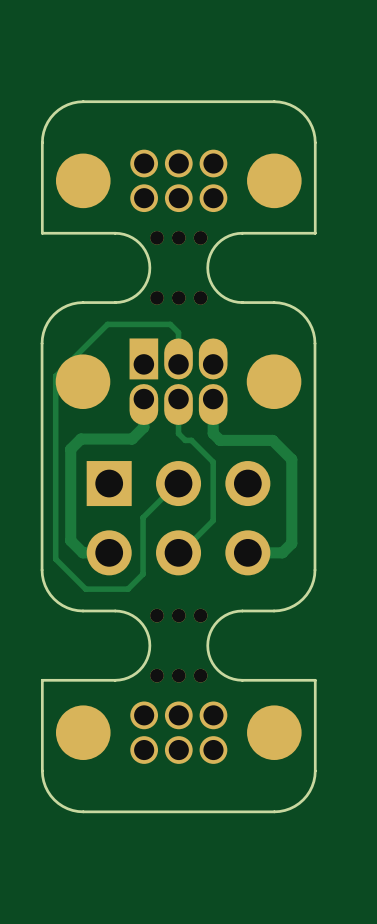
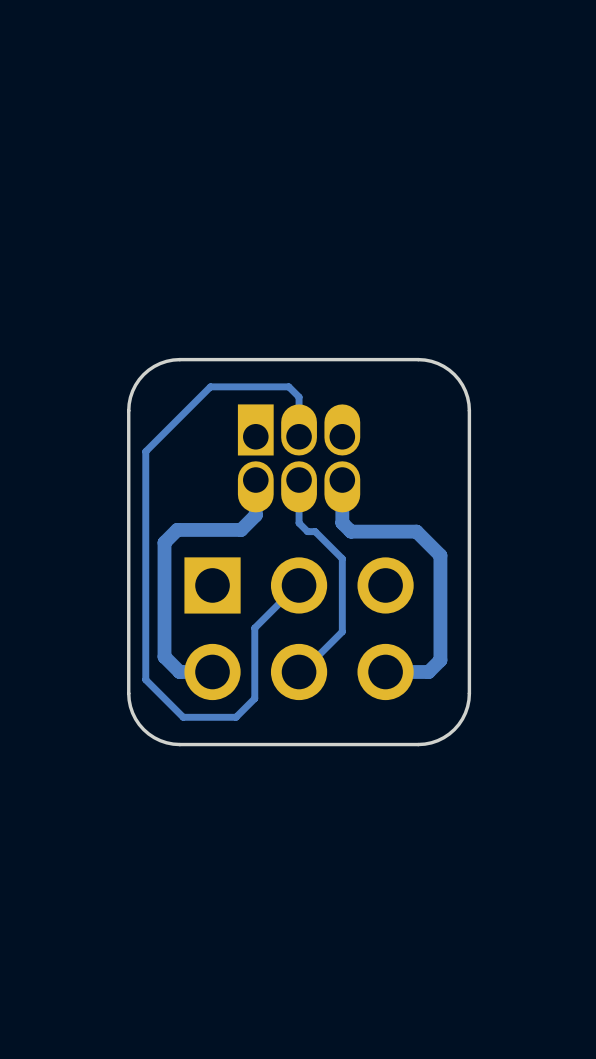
part: (83, 180) -> none
part: (178, 180) -> none
part: (274, 180) -> none
part: (178, 267) -> none
board edge: (242, 302) (233, 301) (221, 295) (210, 281) (208, 263) (212, 250) (217, 243) (225, 237) (237, 233) (315, 233) (313, 132) (303, 113) (284, 103) (83, 101) (67, 104) (50, 117) (42, 137) (42, 233) (124, 234) (136, 240) (147, 254) (149, 272) (145, 285) (132, 297) (115, 302) -> (378, 359) (220, 359)
part: (83, 381) -> none
part: (274, 381) -> none
board edge: (242, 610) (225, 615) (214, 624) (210, 632) (208, 650) (212, 662) (217, 670) (225, 675) (237, 680) (315, 680) (313, 781) (303, 799) (284, 810) (83, 811) (67, 808) (50, 795) (42, 776) (42, 680) (124, 679) (136, 673) (147, 658) (149, 641) (145, 628) (132, 615) (115, 610) -> (378, 744) (220, 744)
part: (178, 645) -> none
part: (83, 732) -> none
part: (178, 732) -> none
part: (274, 732) -> none

